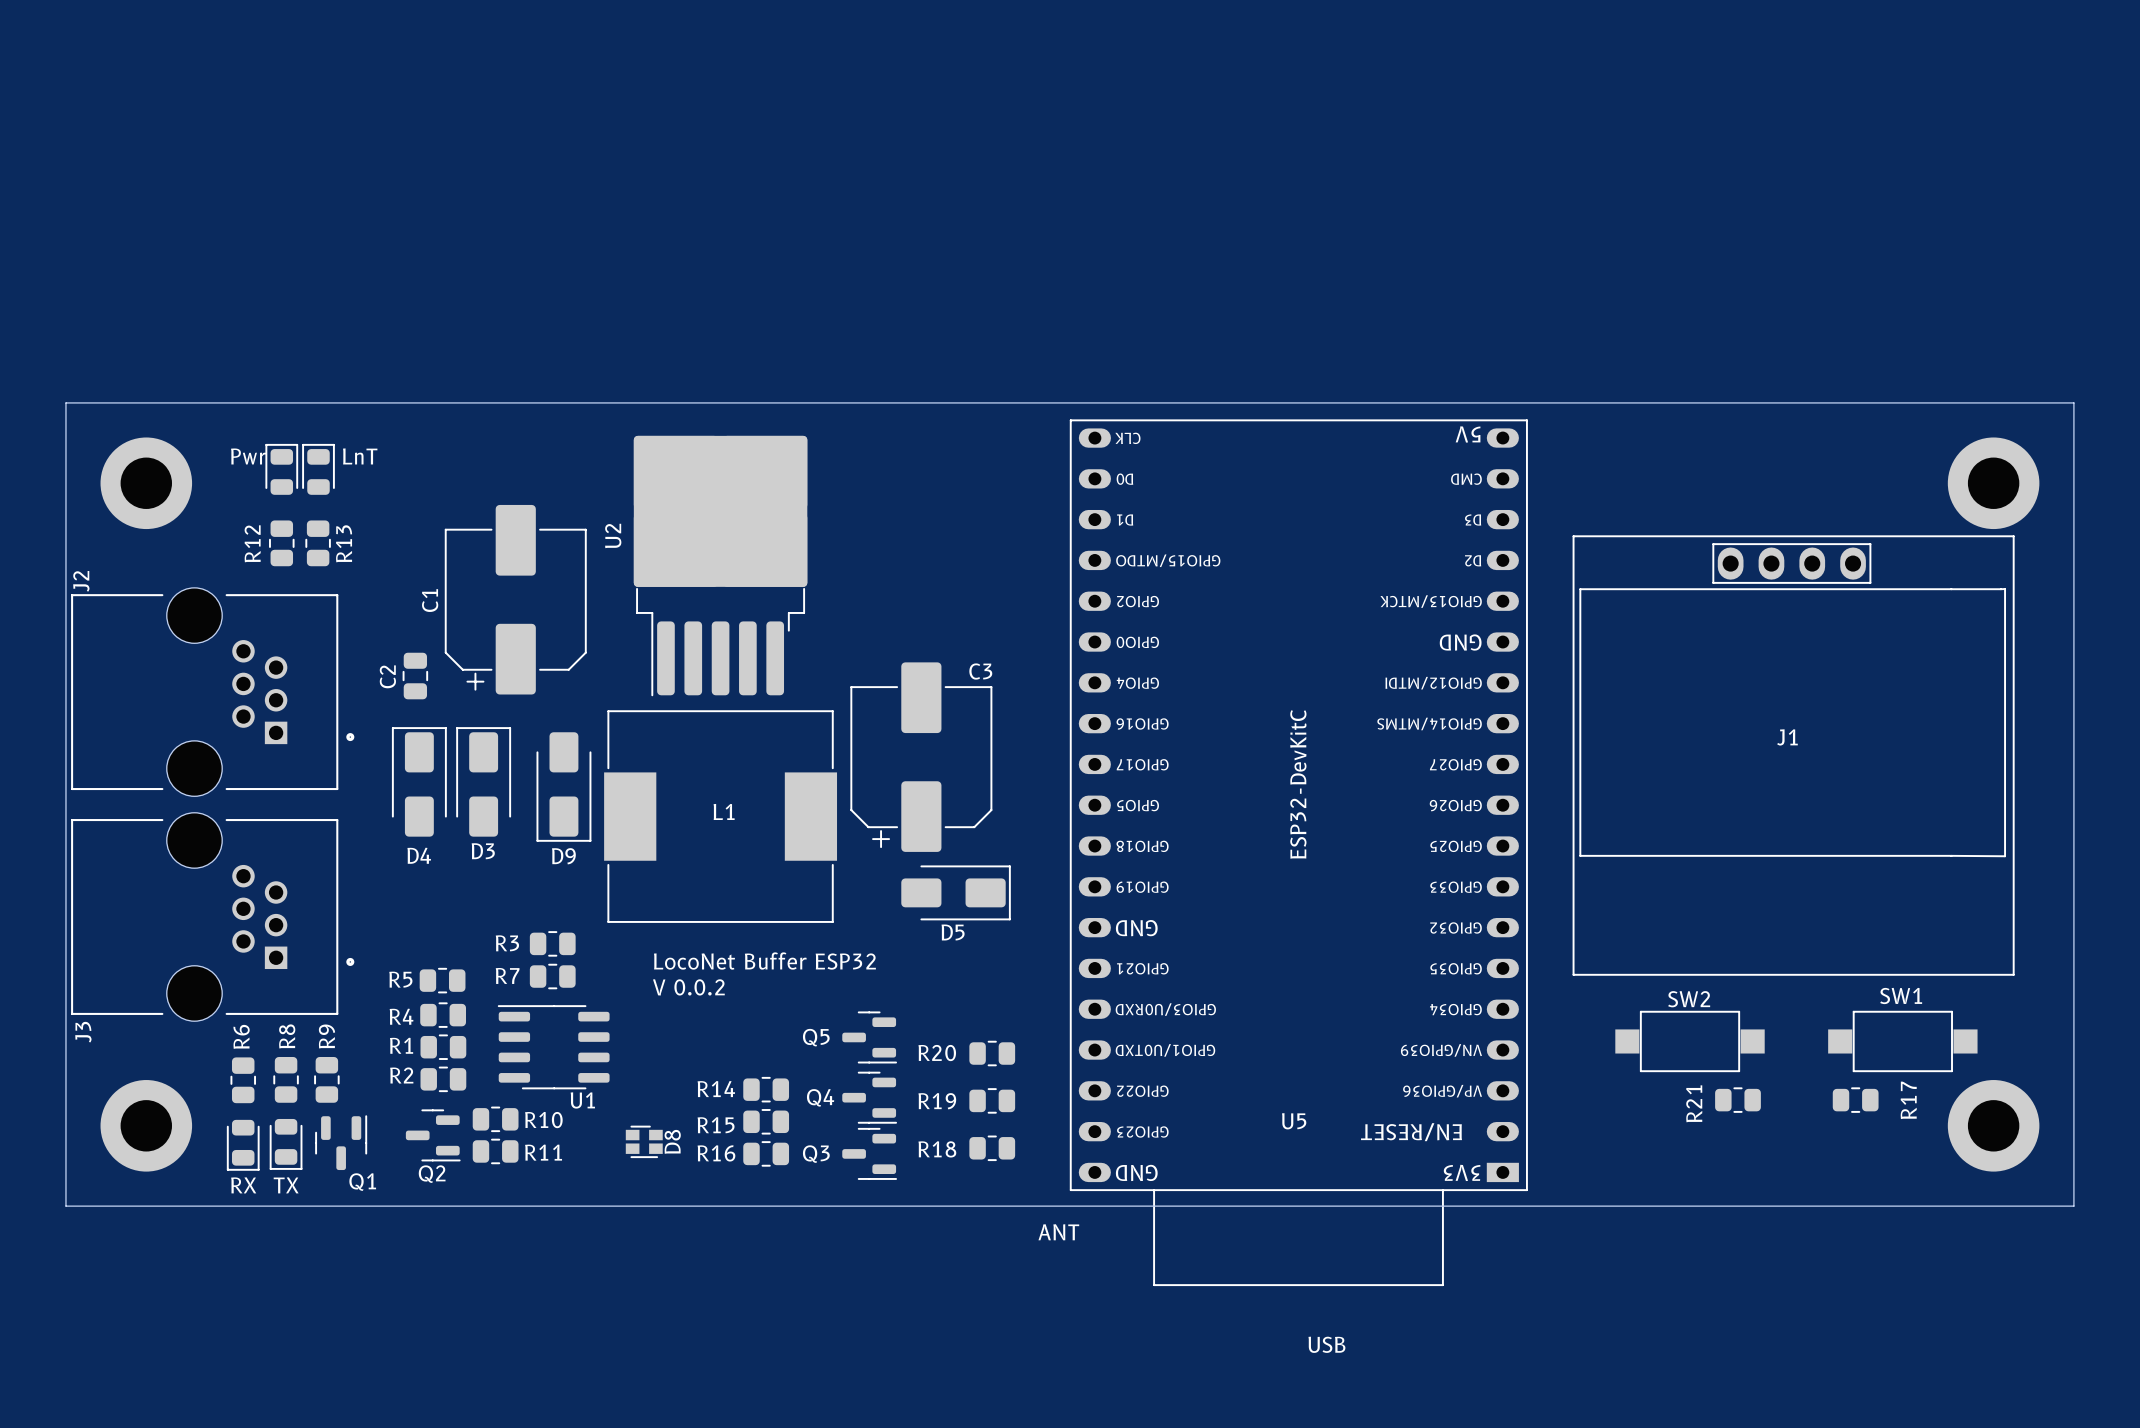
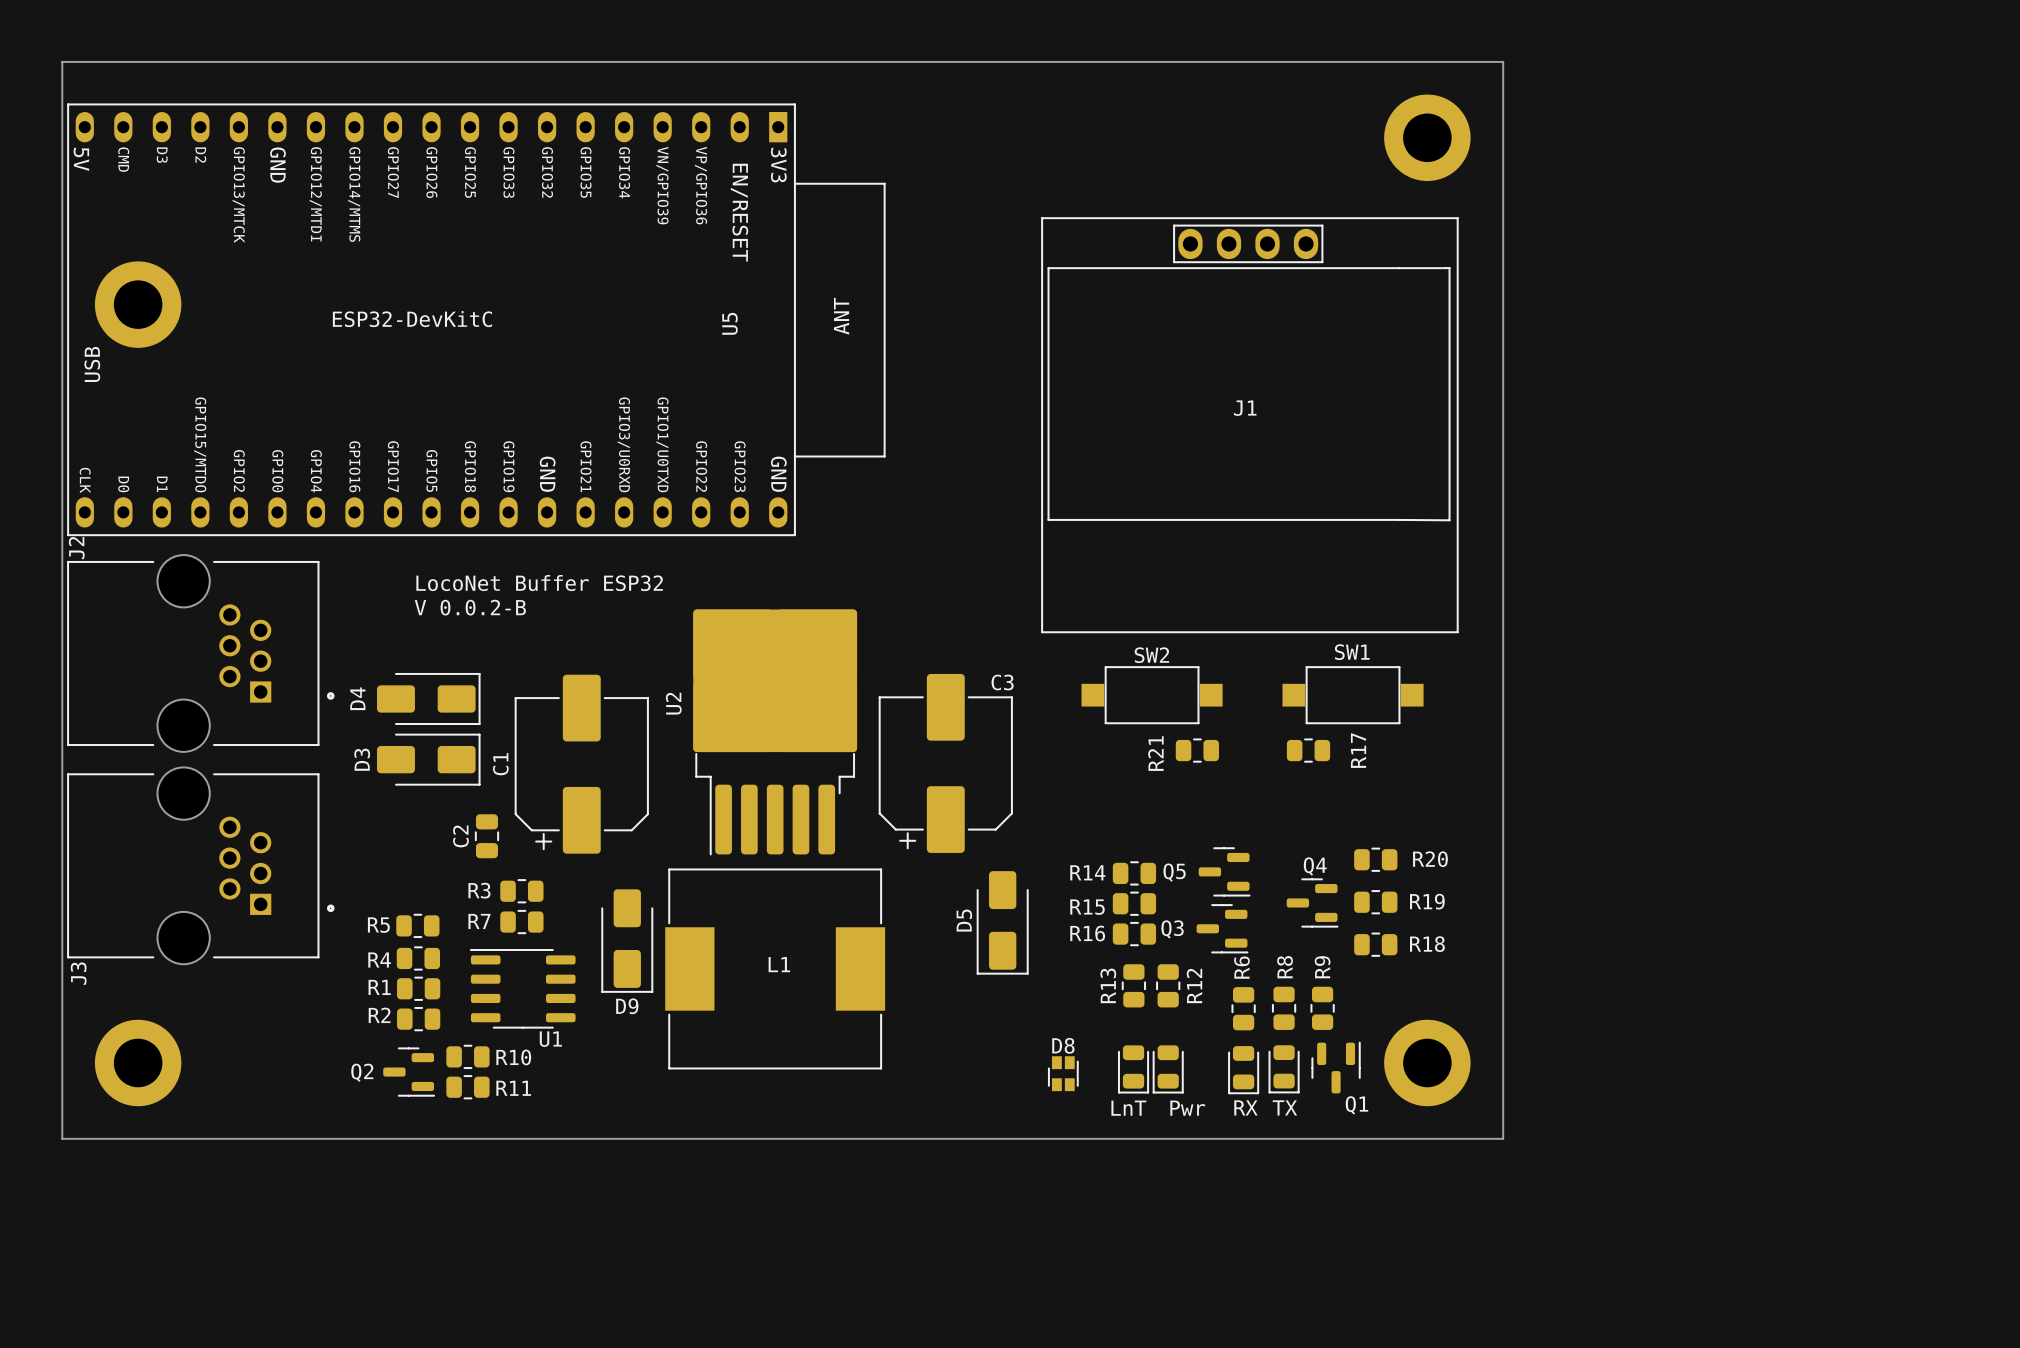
part: none -> (1427, 137)
text: none -> ANT (841, 316)
text: none -> USB (92, 364)
board edge: (65, 402) (2073, 402) (2073, 1206) (1592, 1206) -> (62, 380) (62, 61) (1503, 61) (1503, 1138)
text: Pwr (248, 456) -> none
text: LnT (360, 456) -> none
part: (281, 469) -> none
part: (318, 469) -> none
part position: (146, 483) -> (138, 304)
part: (1993, 483) -> none
R12 name position: R12 (252, 543) -> R12 (1194, 985)
R12 position: (281, 543) -> (1168, 985)
R13 position: (318, 543) -> (1133, 985)
R13 name position: R13 (344, 543) -> R13 (1108, 985)
U2 position: (720, 566) -> (775, 732)
C1 position: (515, 599) -> (581, 764)
text: none -> LocoNet Buffer ESP32 (539, 583)
text: none -> V 0.0.2-B (470, 607)
C2 position: (415, 676) -> (486, 836)
J1 position: (1793, 755) -> (1249, 425)
C3 position: (921, 757) -> (945, 763)
D4 rotation: 0° (419, 781) -> 90° clockwise (428, 698)
D3 rotation: 0° (483, 781) -> 90° clockwise (428, 759)
D9 position: (563, 787) -> (627, 941)
L1 position: (720, 816) -> (775, 968)
U5 rotation: 0° (1298, 852) -> 90° counterclockwise (476, 319)
U5 position: (1298, 852) -> (476, 319)
D5 rotation: 0° (956, 892) -> 90° clockwise (1002, 922)
D5 position: (956, 892) -> (1002, 922)
text: LocoNet Buffer ESP32 (764, 961) -> none
text: V 0.0.2 (688, 987) -> none
Q5 position: (869, 1037) -> (1224, 871)
SW2 position: (1690, 1041) -> (1152, 695)
SW1 position: (1902, 1041) -> (1353, 695)
R20 name position: R20 (937, 1053) -> R20 (1430, 859)
R20 position: (992, 1053) -> (1375, 859)
R8 position: (286, 1079) -> (1284, 1008)
R9 position: (326, 1079) -> (1322, 1008)
R6 position: (243, 1080) -> (1243, 1008)
R14 position: (766, 1089) -> (1134, 873)
Q4 name position: Q4 (820, 1097) -> Q4 (1315, 866)
Q4 position: (869, 1097) -> (1312, 902)
R19 position: (992, 1100) -> (1375, 902)
R21 position: (1738, 1100) -> (1197, 750)
R17 position: (1855, 1100) -> (1308, 750)
R19 name position: R19 (937, 1101) -> R19 (1427, 901)
R15 position: (766, 1121) -> (1134, 903)
part: none -> (1427, 1062)
part: (1993, 1125) -> none
part: none -> (1133, 1069)
part: none -> (1168, 1069)
part: none -> (1284, 1069)
part: none -> (1243, 1070)
D8 rotation: 0° (644, 1141) -> 90° counterclockwise (1063, 1073)
D8 position: (644, 1141) -> (1063, 1073)
Q1 position: (341, 1142) -> (1336, 1067)
part: (286, 1144) -> none
part: (243, 1145) -> none
R18 position: (992, 1148) -> (1375, 944)
R18 name position: R18 (937, 1149) -> R18 (1427, 944)
R16 position: (766, 1153) -> (1134, 934)
Q3 position: (869, 1153) -> (1222, 928)
text: none -> LnT (1128, 1108)
text: none -> Pwr (1187, 1108)
text: none -> RX (1245, 1107)
text: none -> TX (1284, 1107)
Q2 name position: Q2 (432, 1174) -> Q2 (362, 1072)
text: RX (243, 1185) -> none
text: TX (286, 1185) -> none
text: ANT (1058, 1232) -> none
text: USB (1326, 1344) -> none

